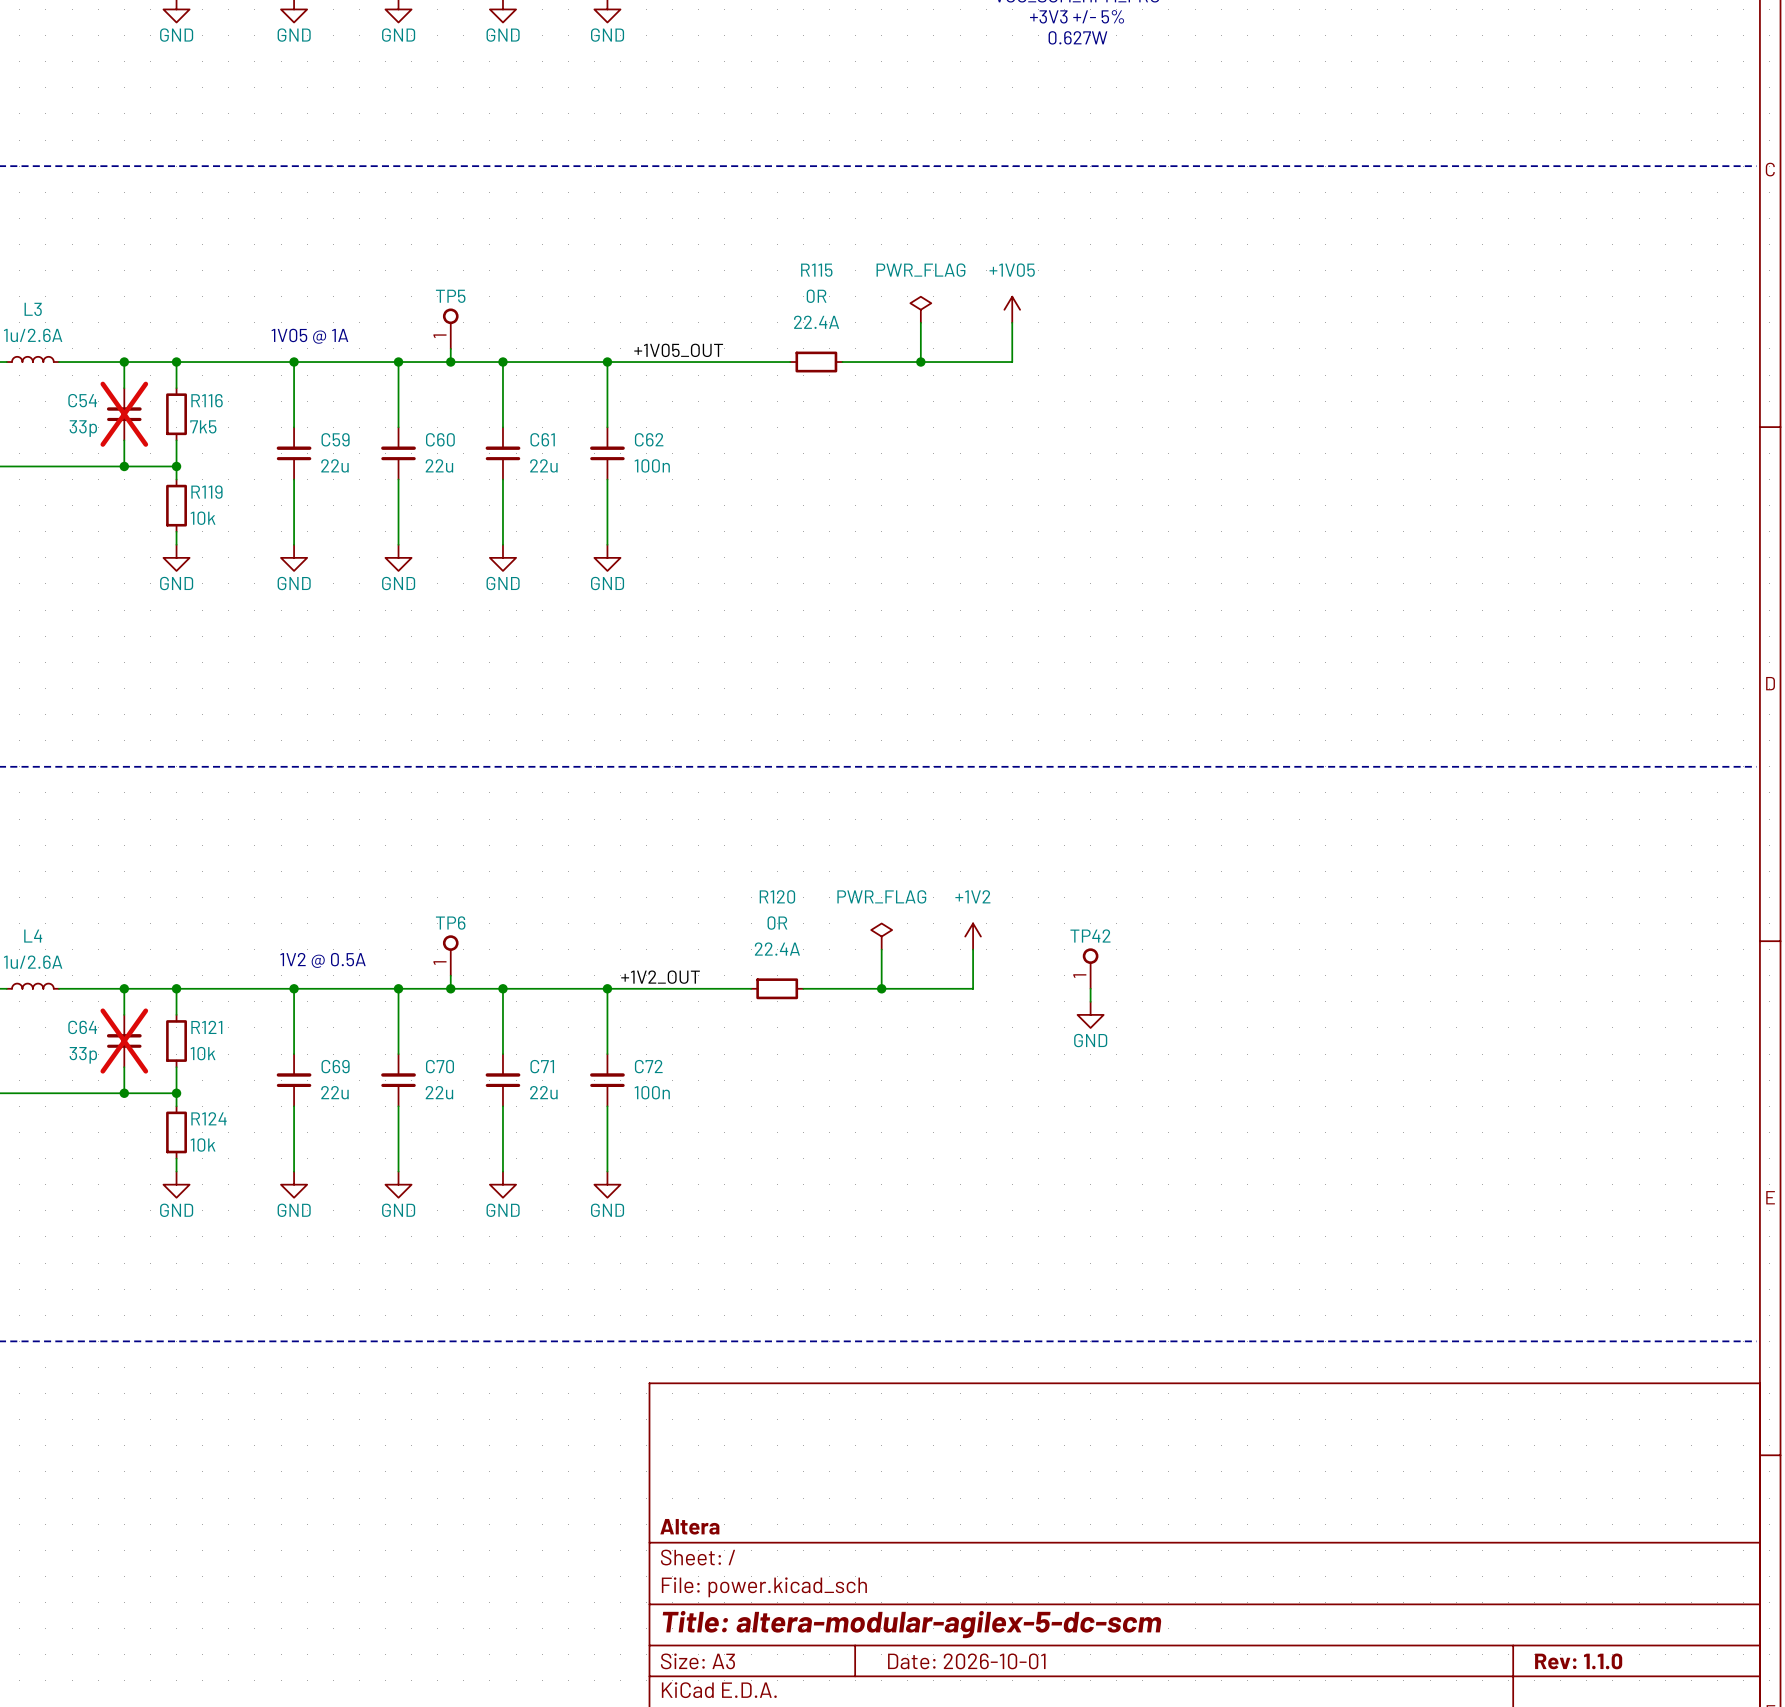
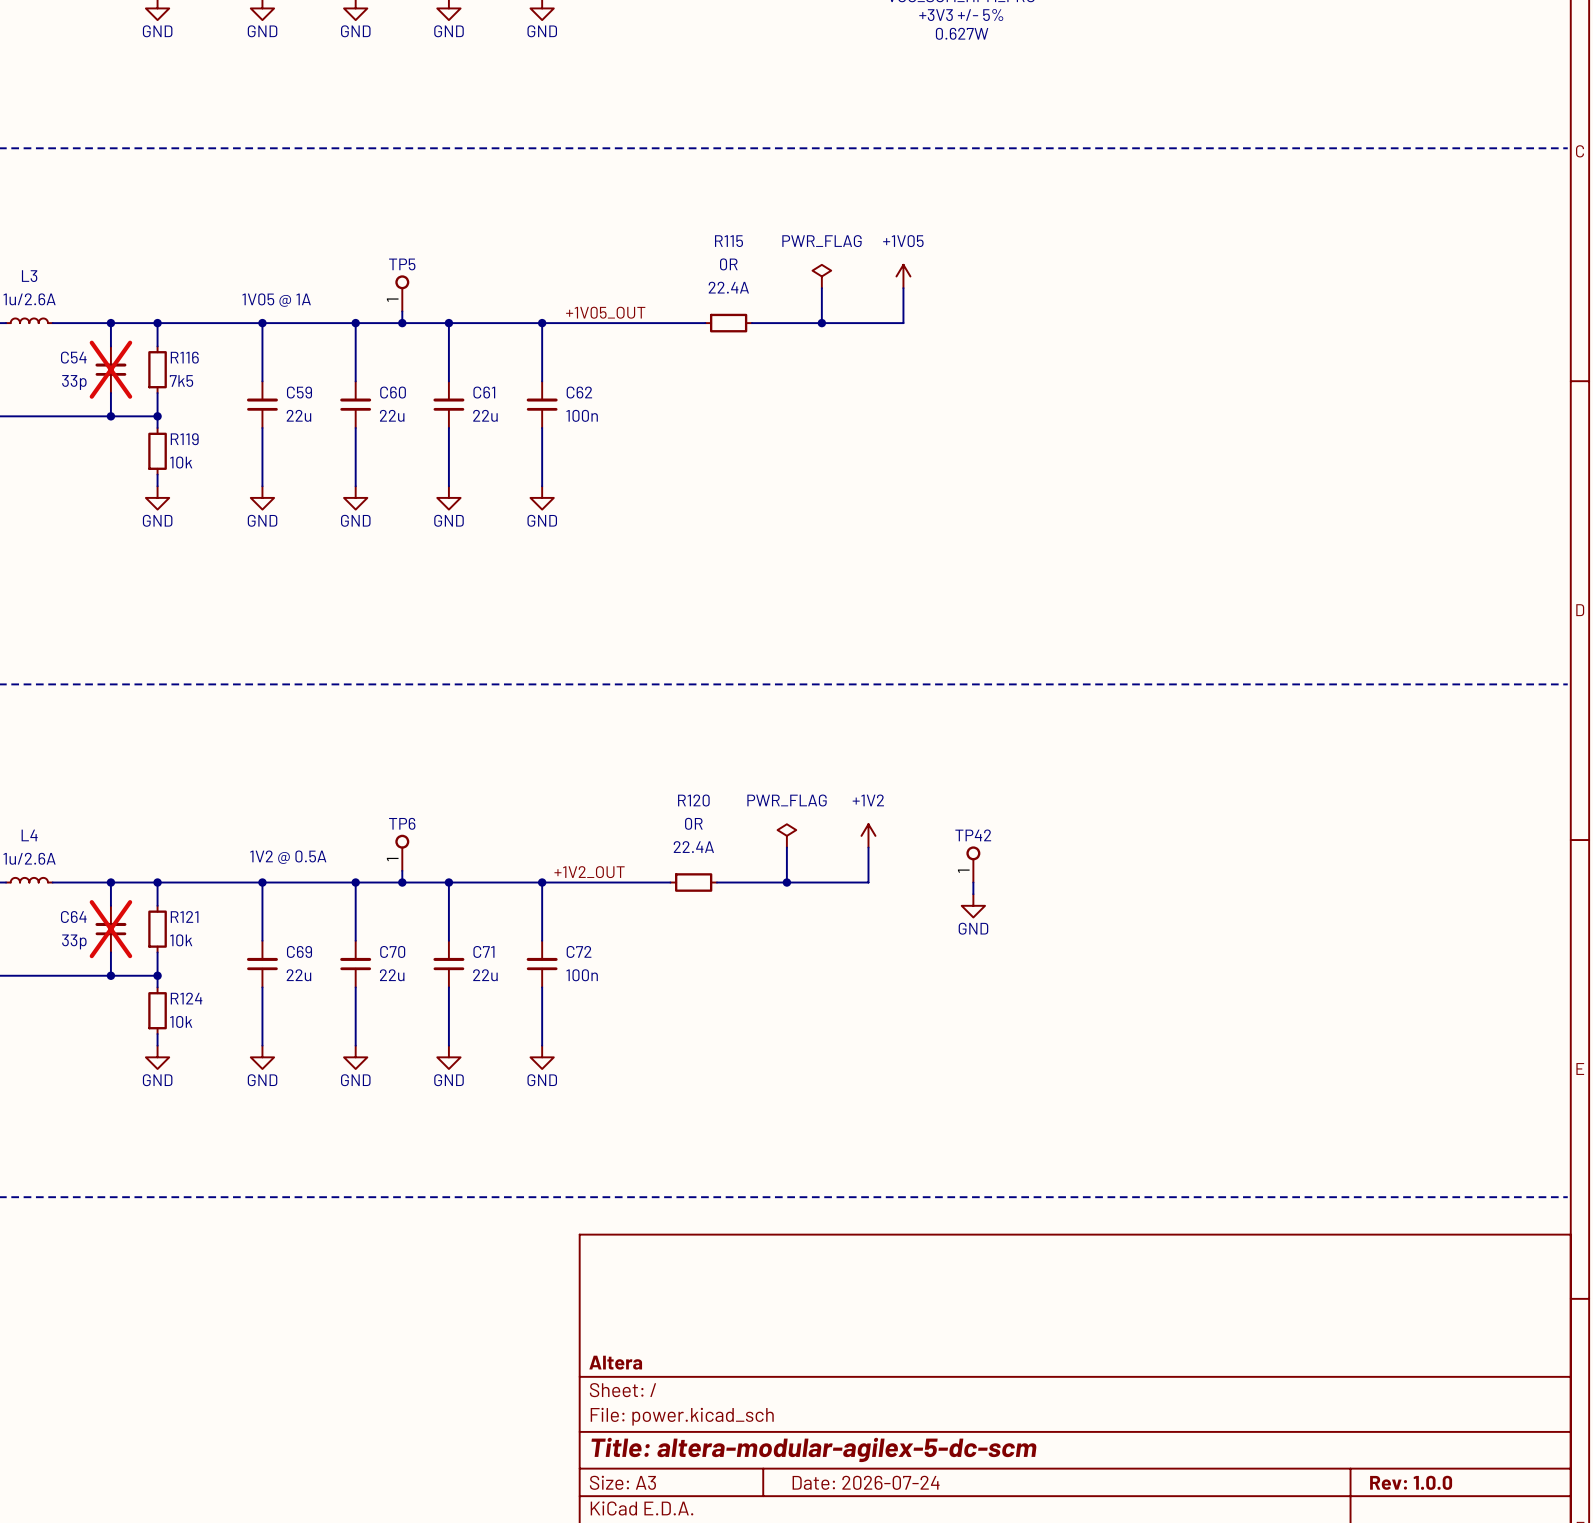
title block: Date: 2026-10-01 (966, 1661) -> Date: 2026-07-24 (866, 1482)
title block: Rev: 1.1.0 (1578, 1661) -> Rev: 1.0.0 (1411, 1482)

